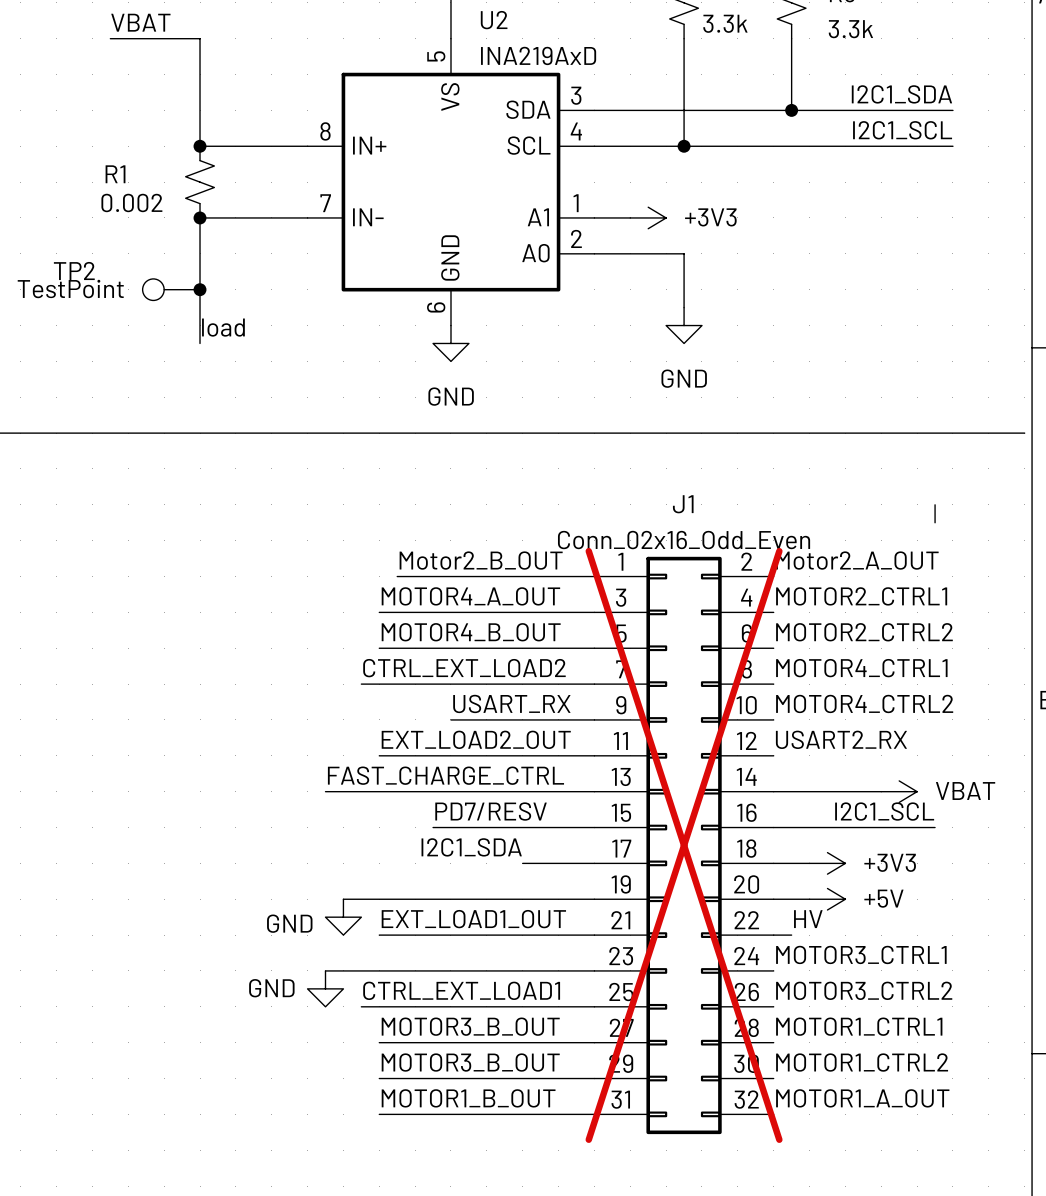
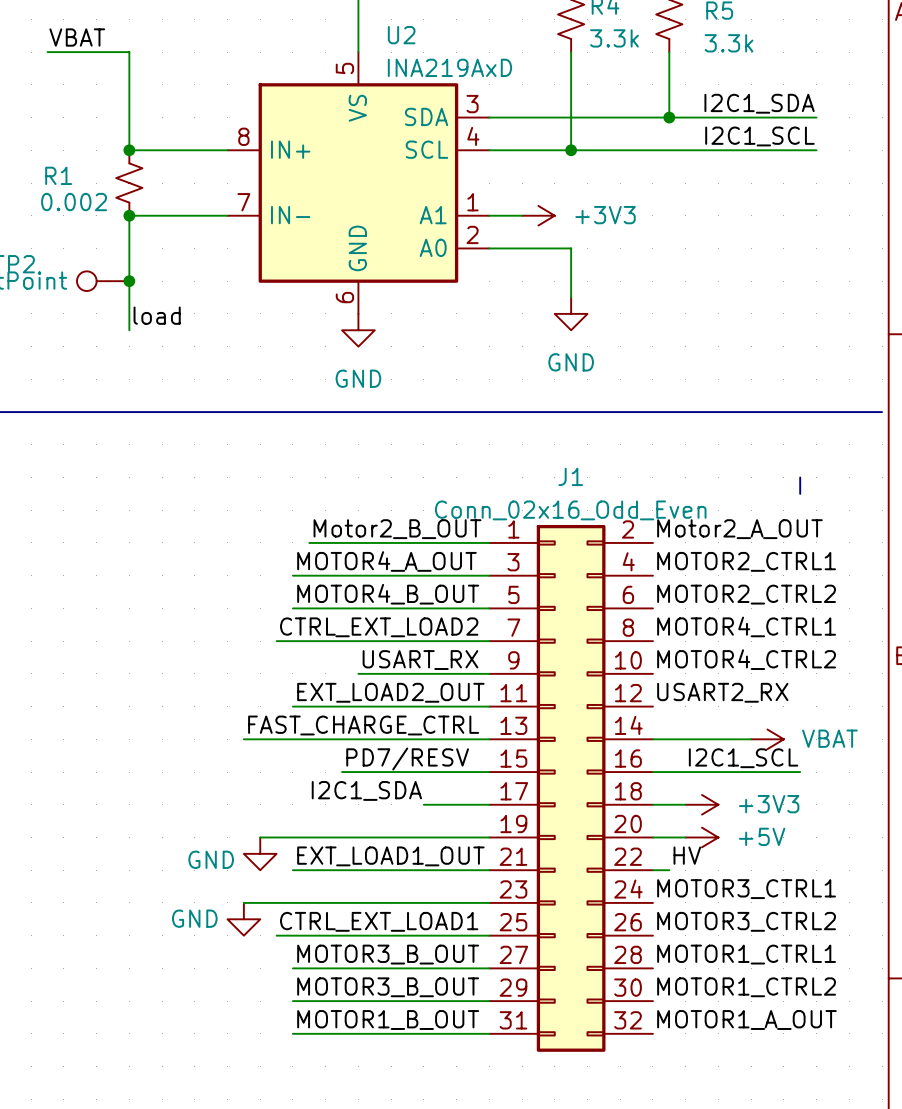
J1 do-not-place cross: (684, 845) -> none

